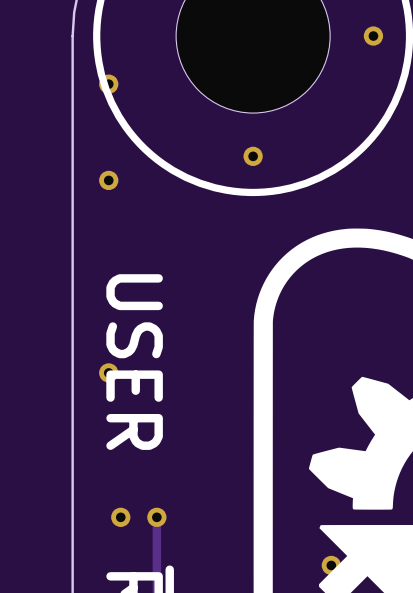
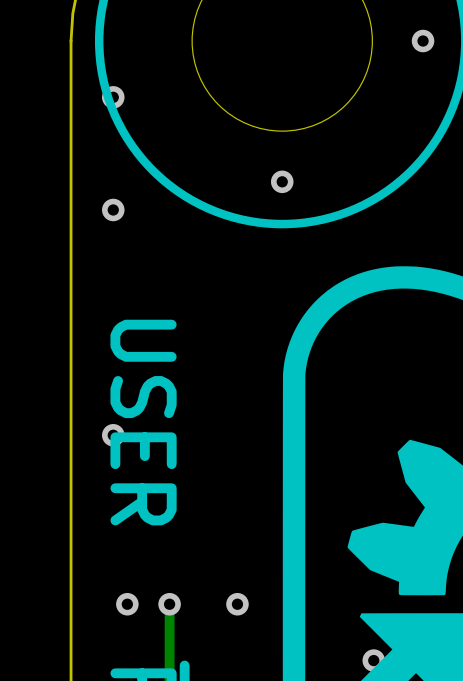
via: none -> (237, 604)

